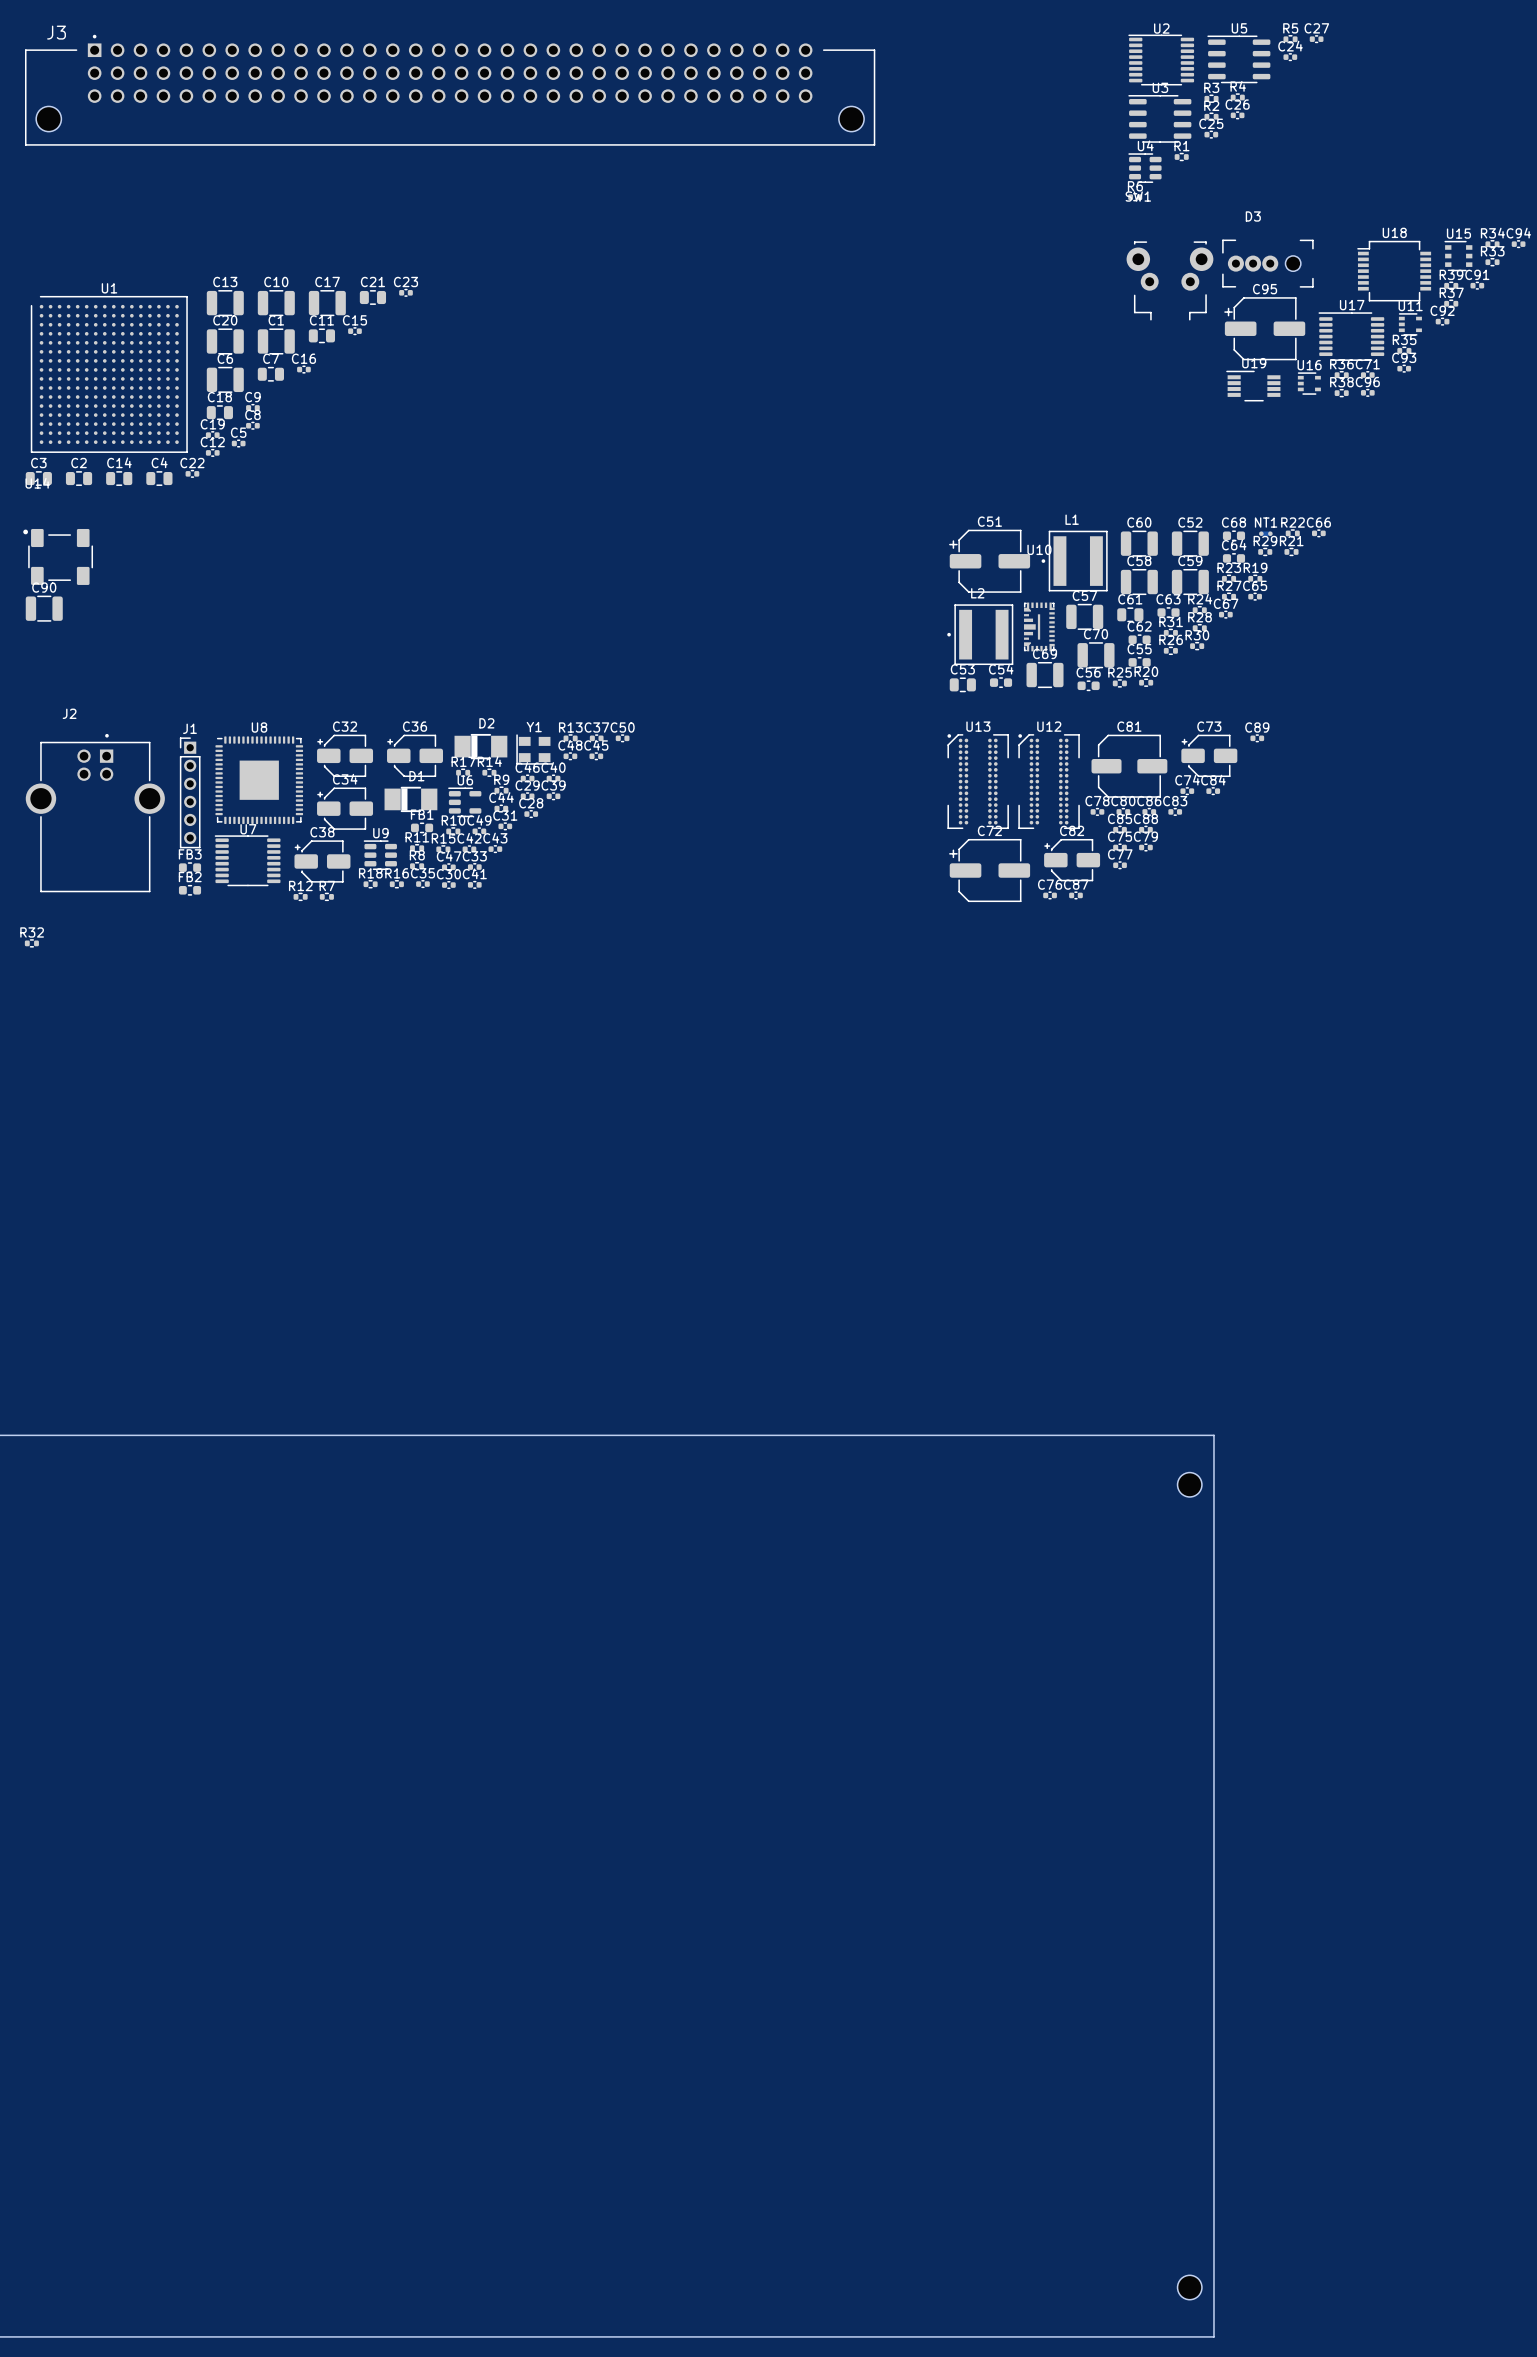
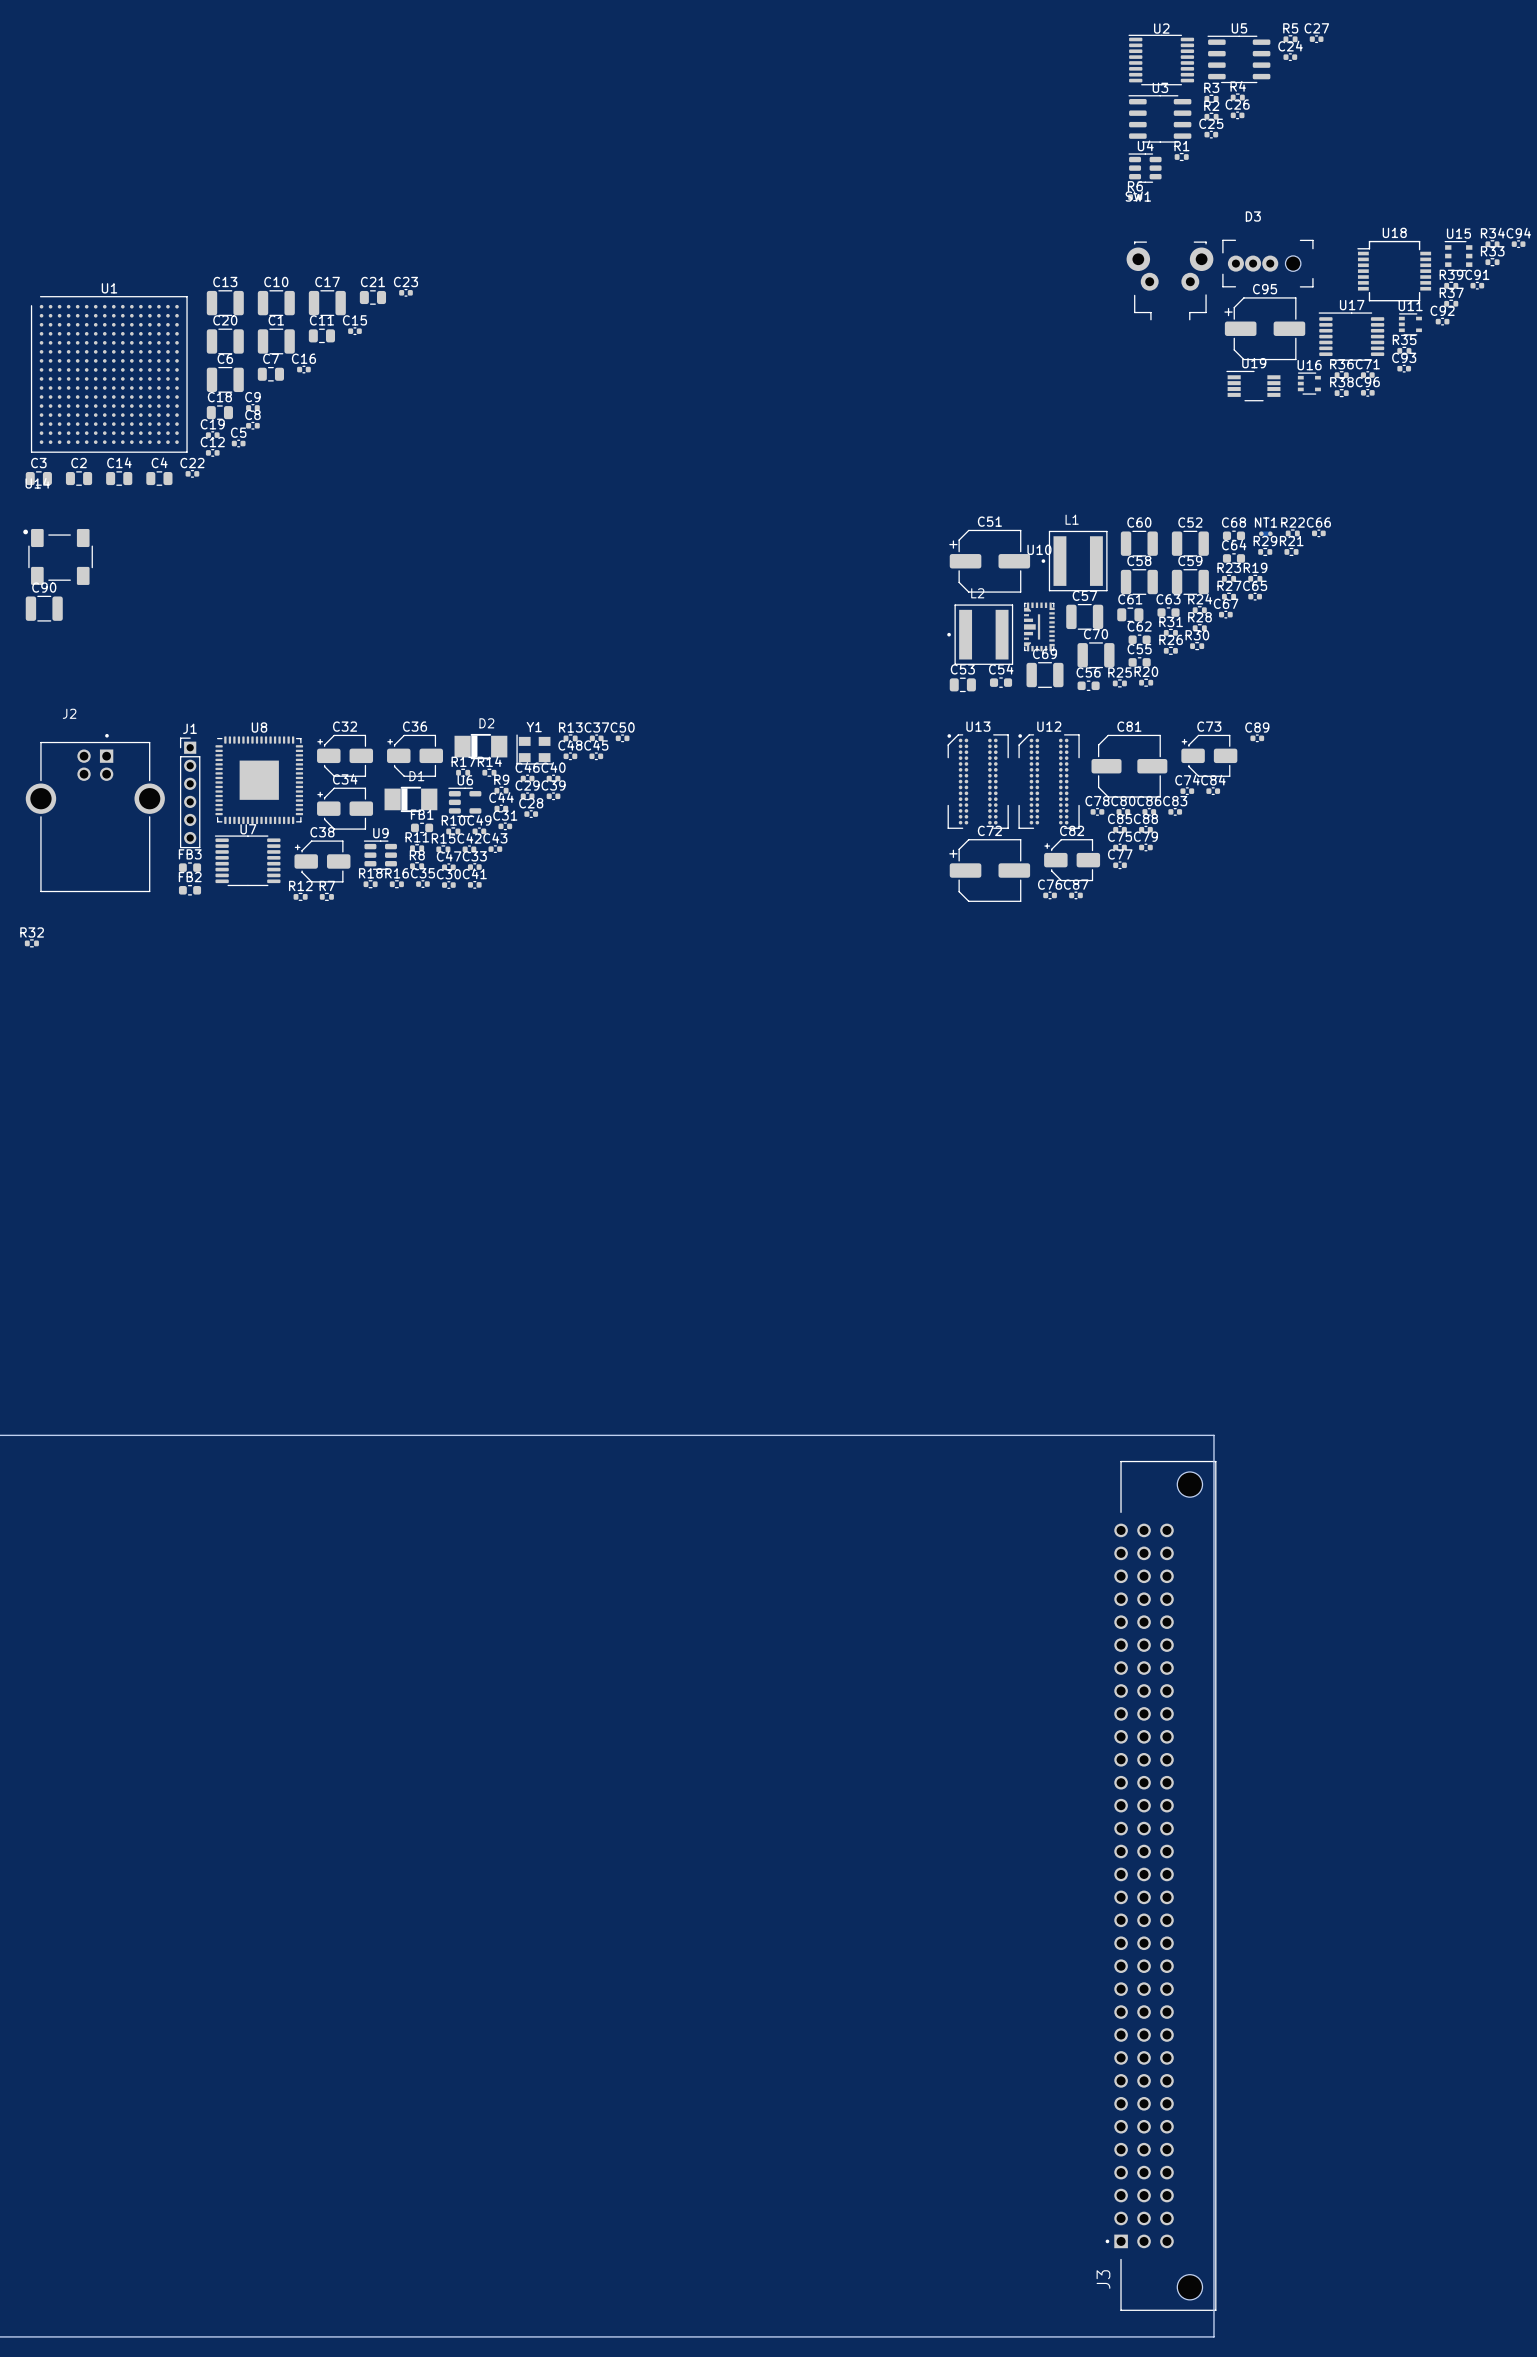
J3 rotation: 0° (450, 90) -> 90° counterclockwise (1161, 1885)
J3 position: (450, 90) -> (1161, 1885)
part: (1189, 1484) -> none
part: (1189, 2287) -> none

